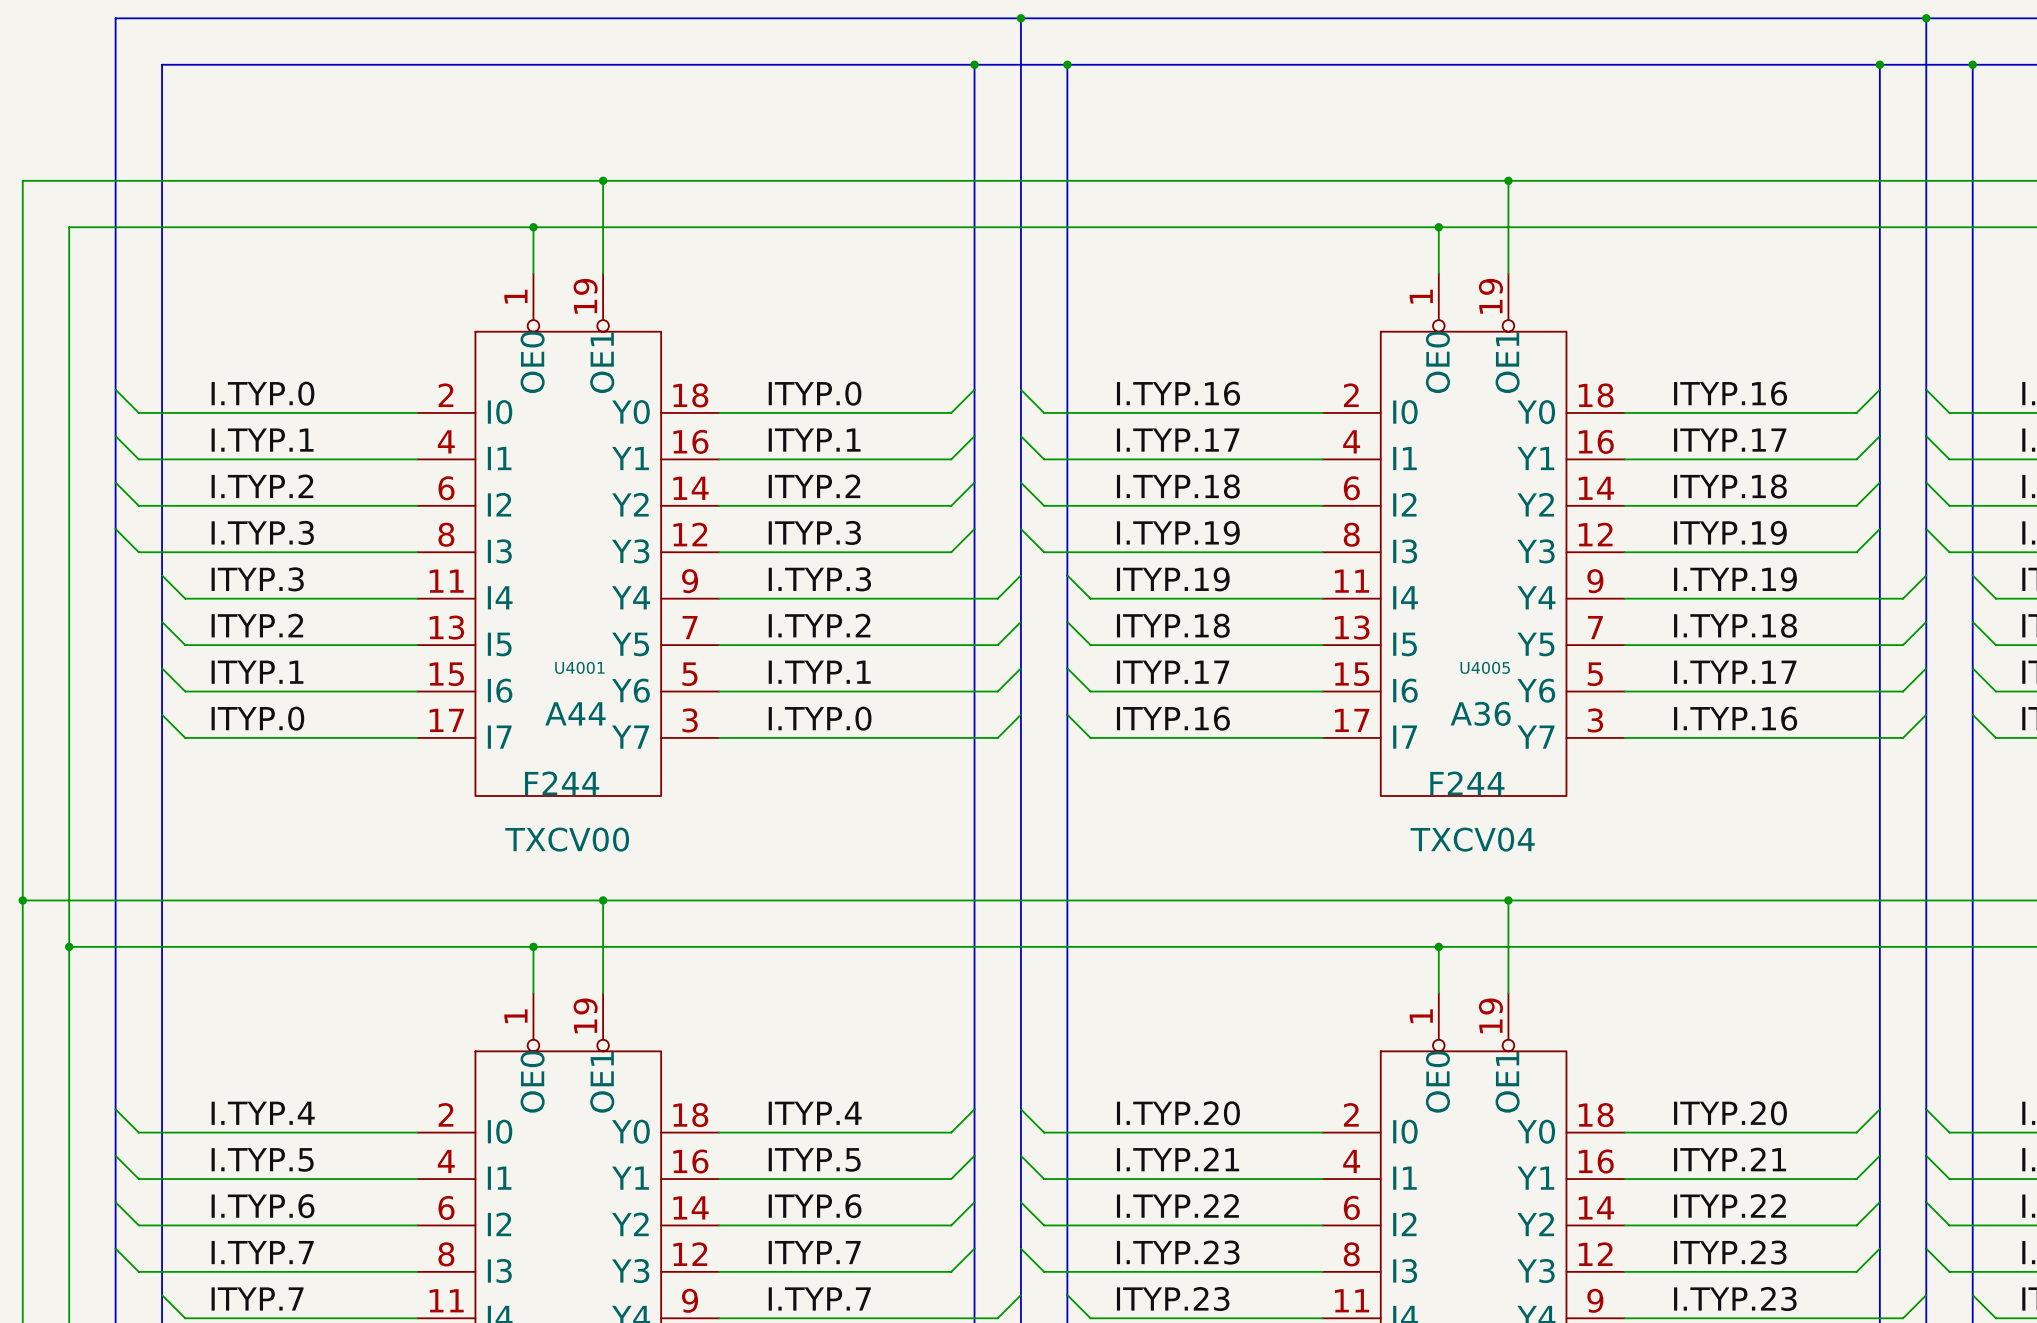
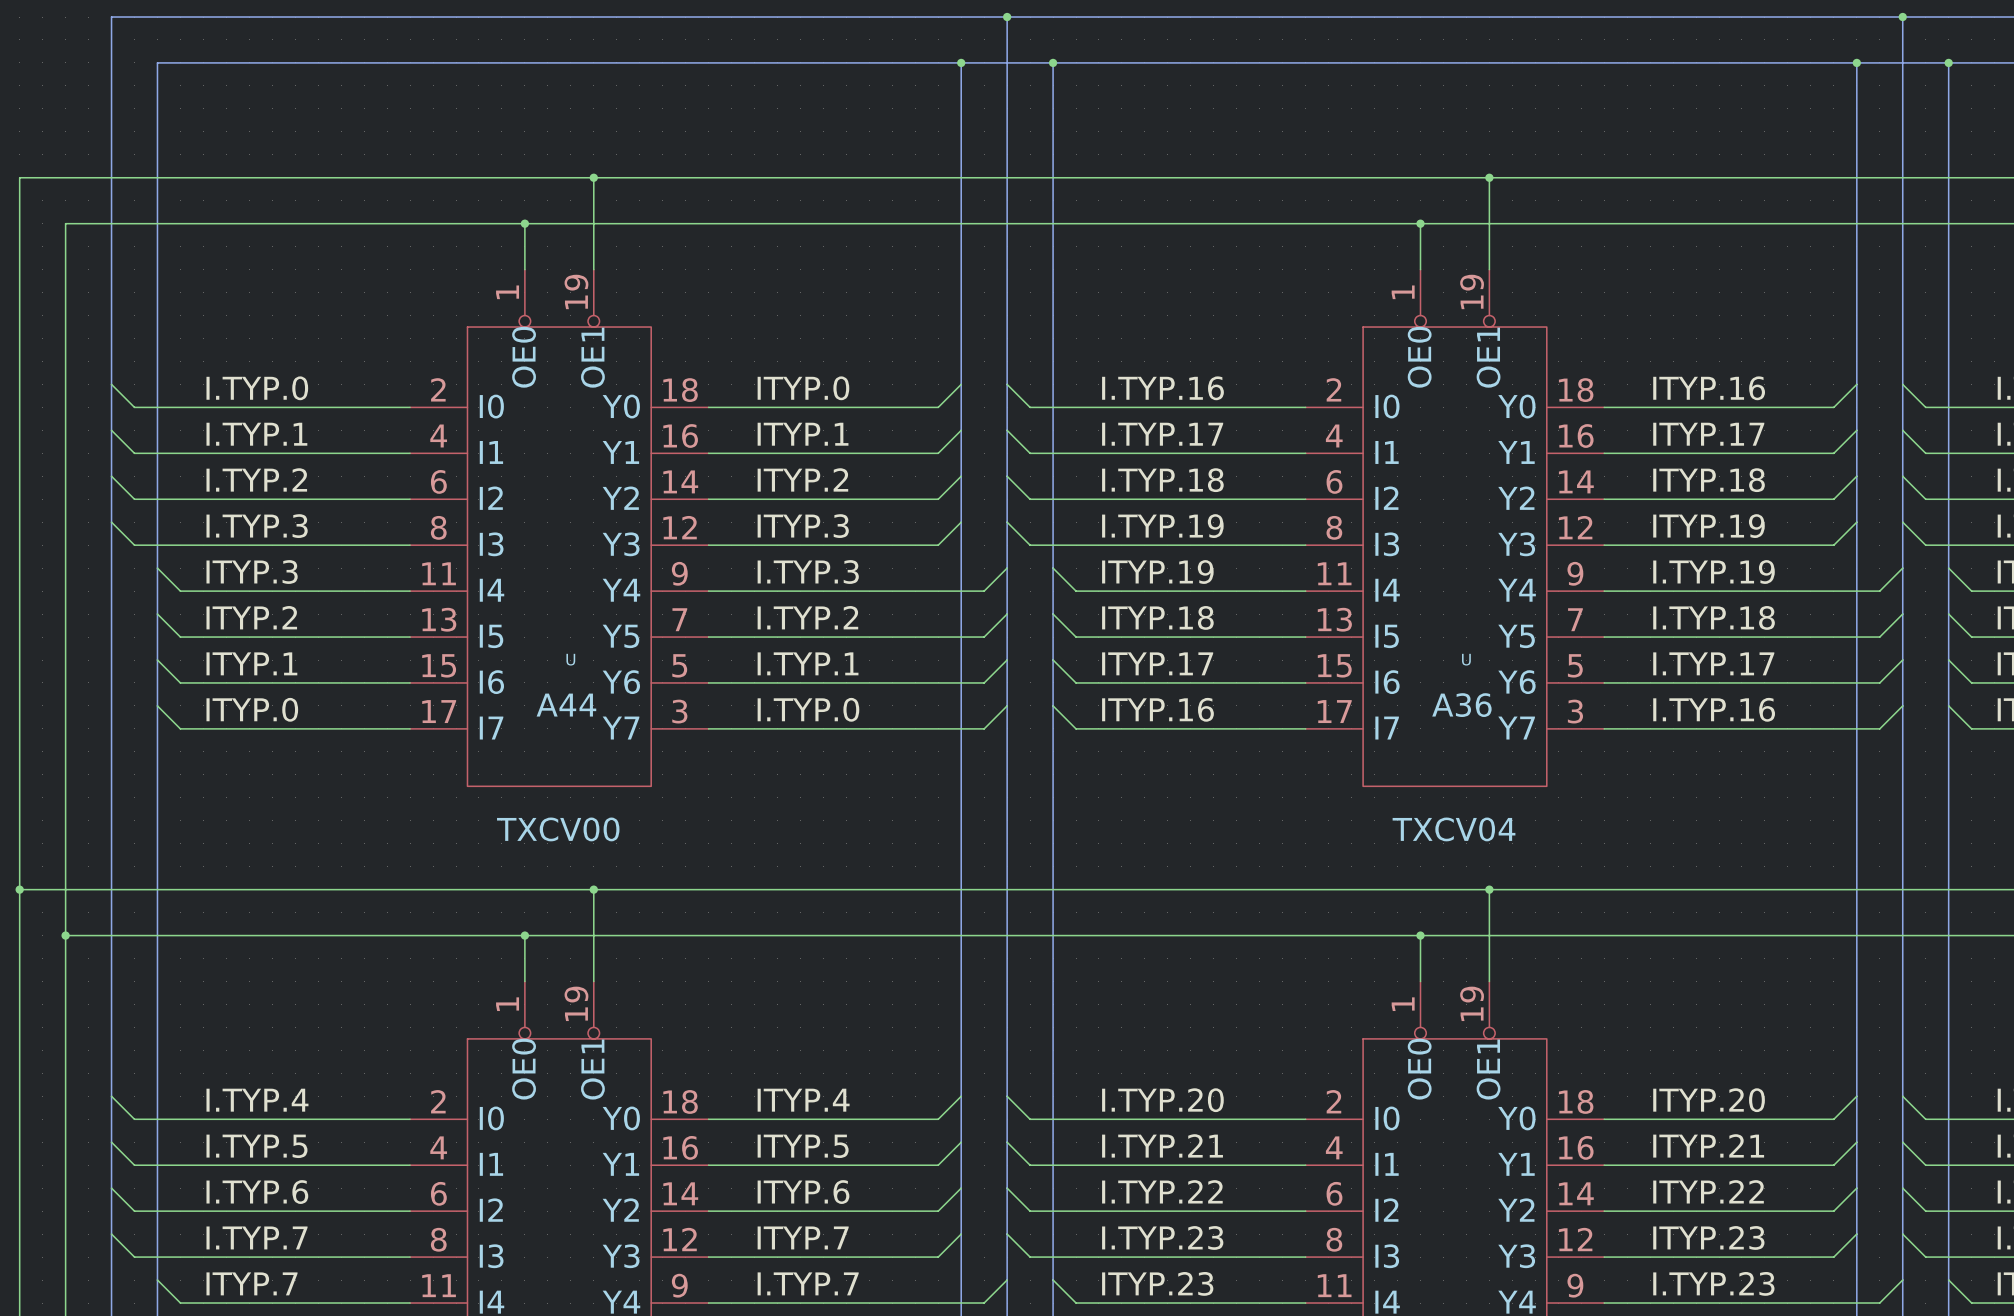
U4001 name: U4001 (579, 667) -> U (570, 659)
U4005 name: U4005 (1485, 667) -> U (1466, 659)
U4001 value: F244 (562, 783) -> none
U4005 value: F244 (1467, 783) -> none

